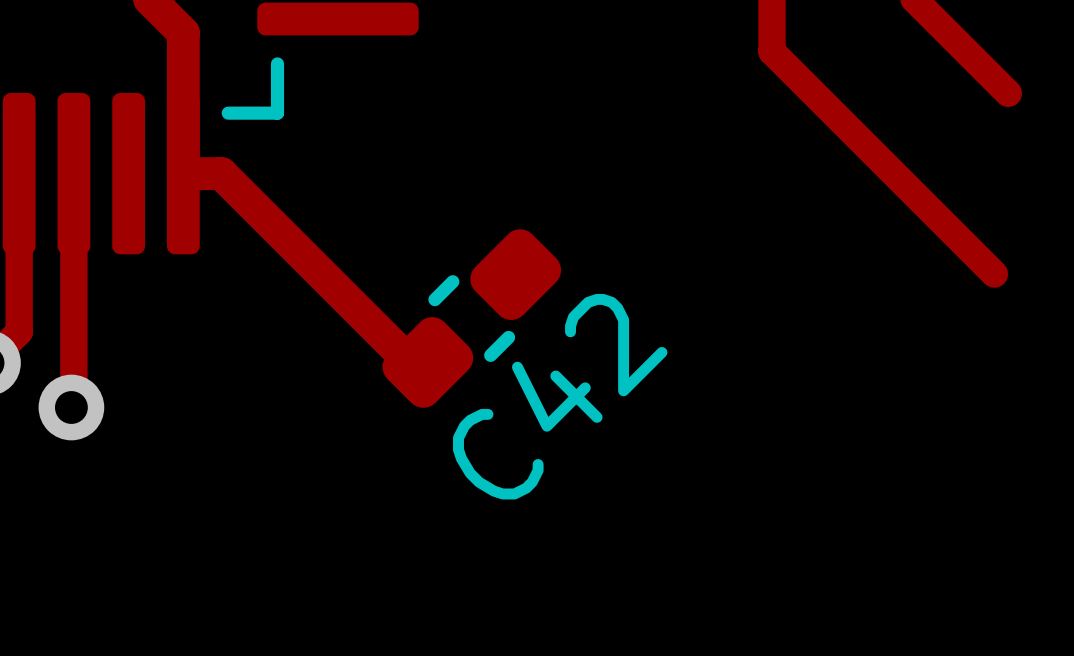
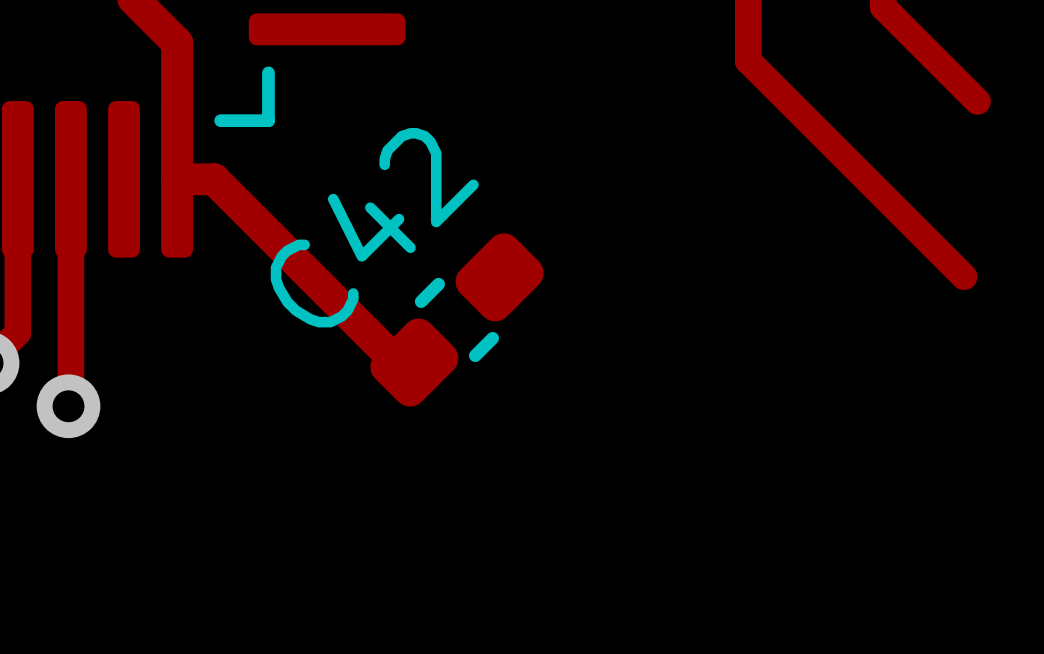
C42 name position: C42 (560, 396) -> C42 (374, 227)

